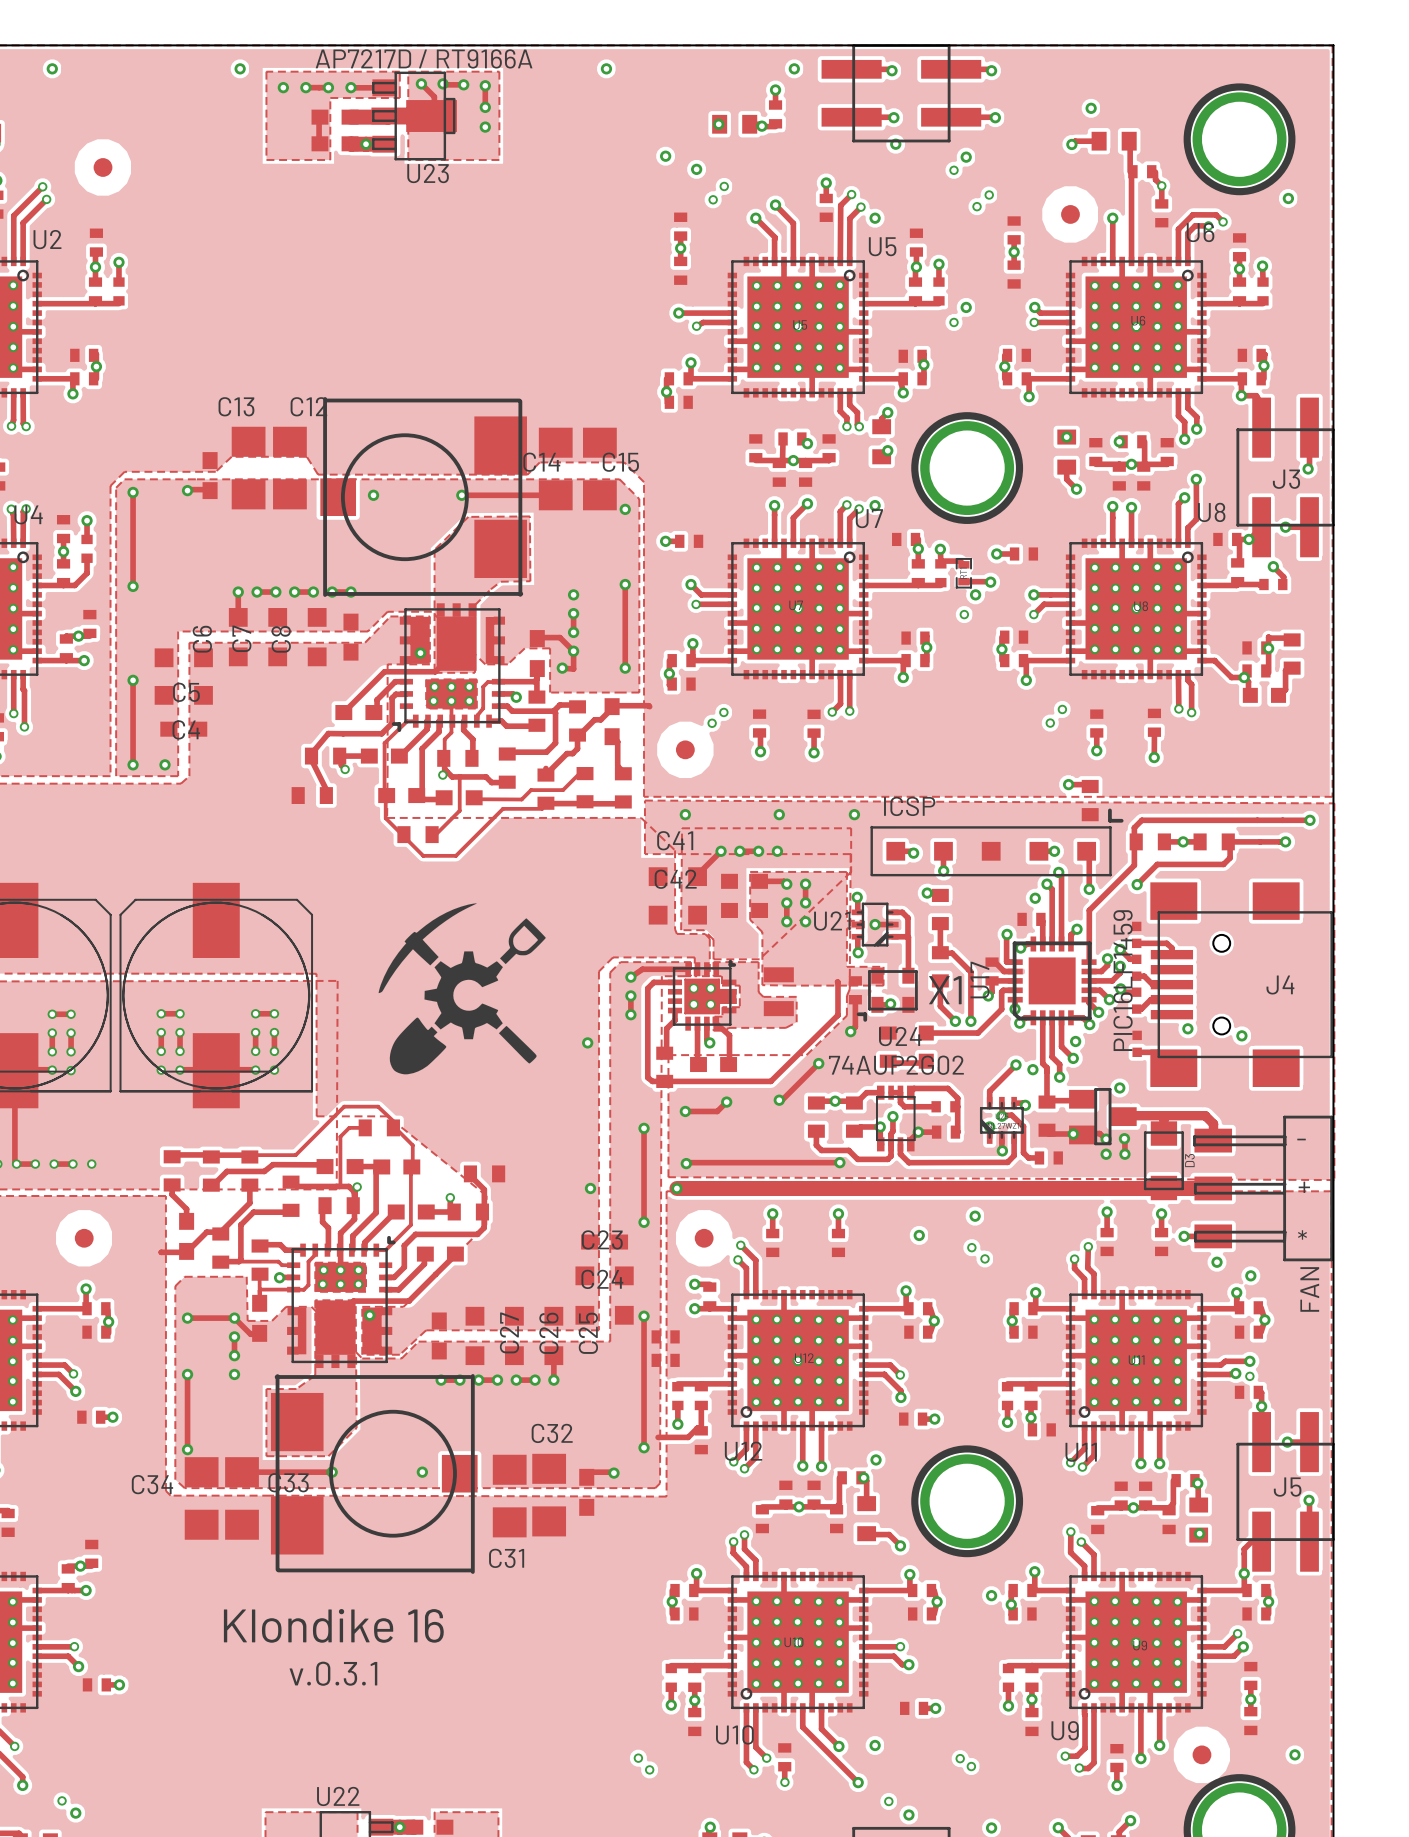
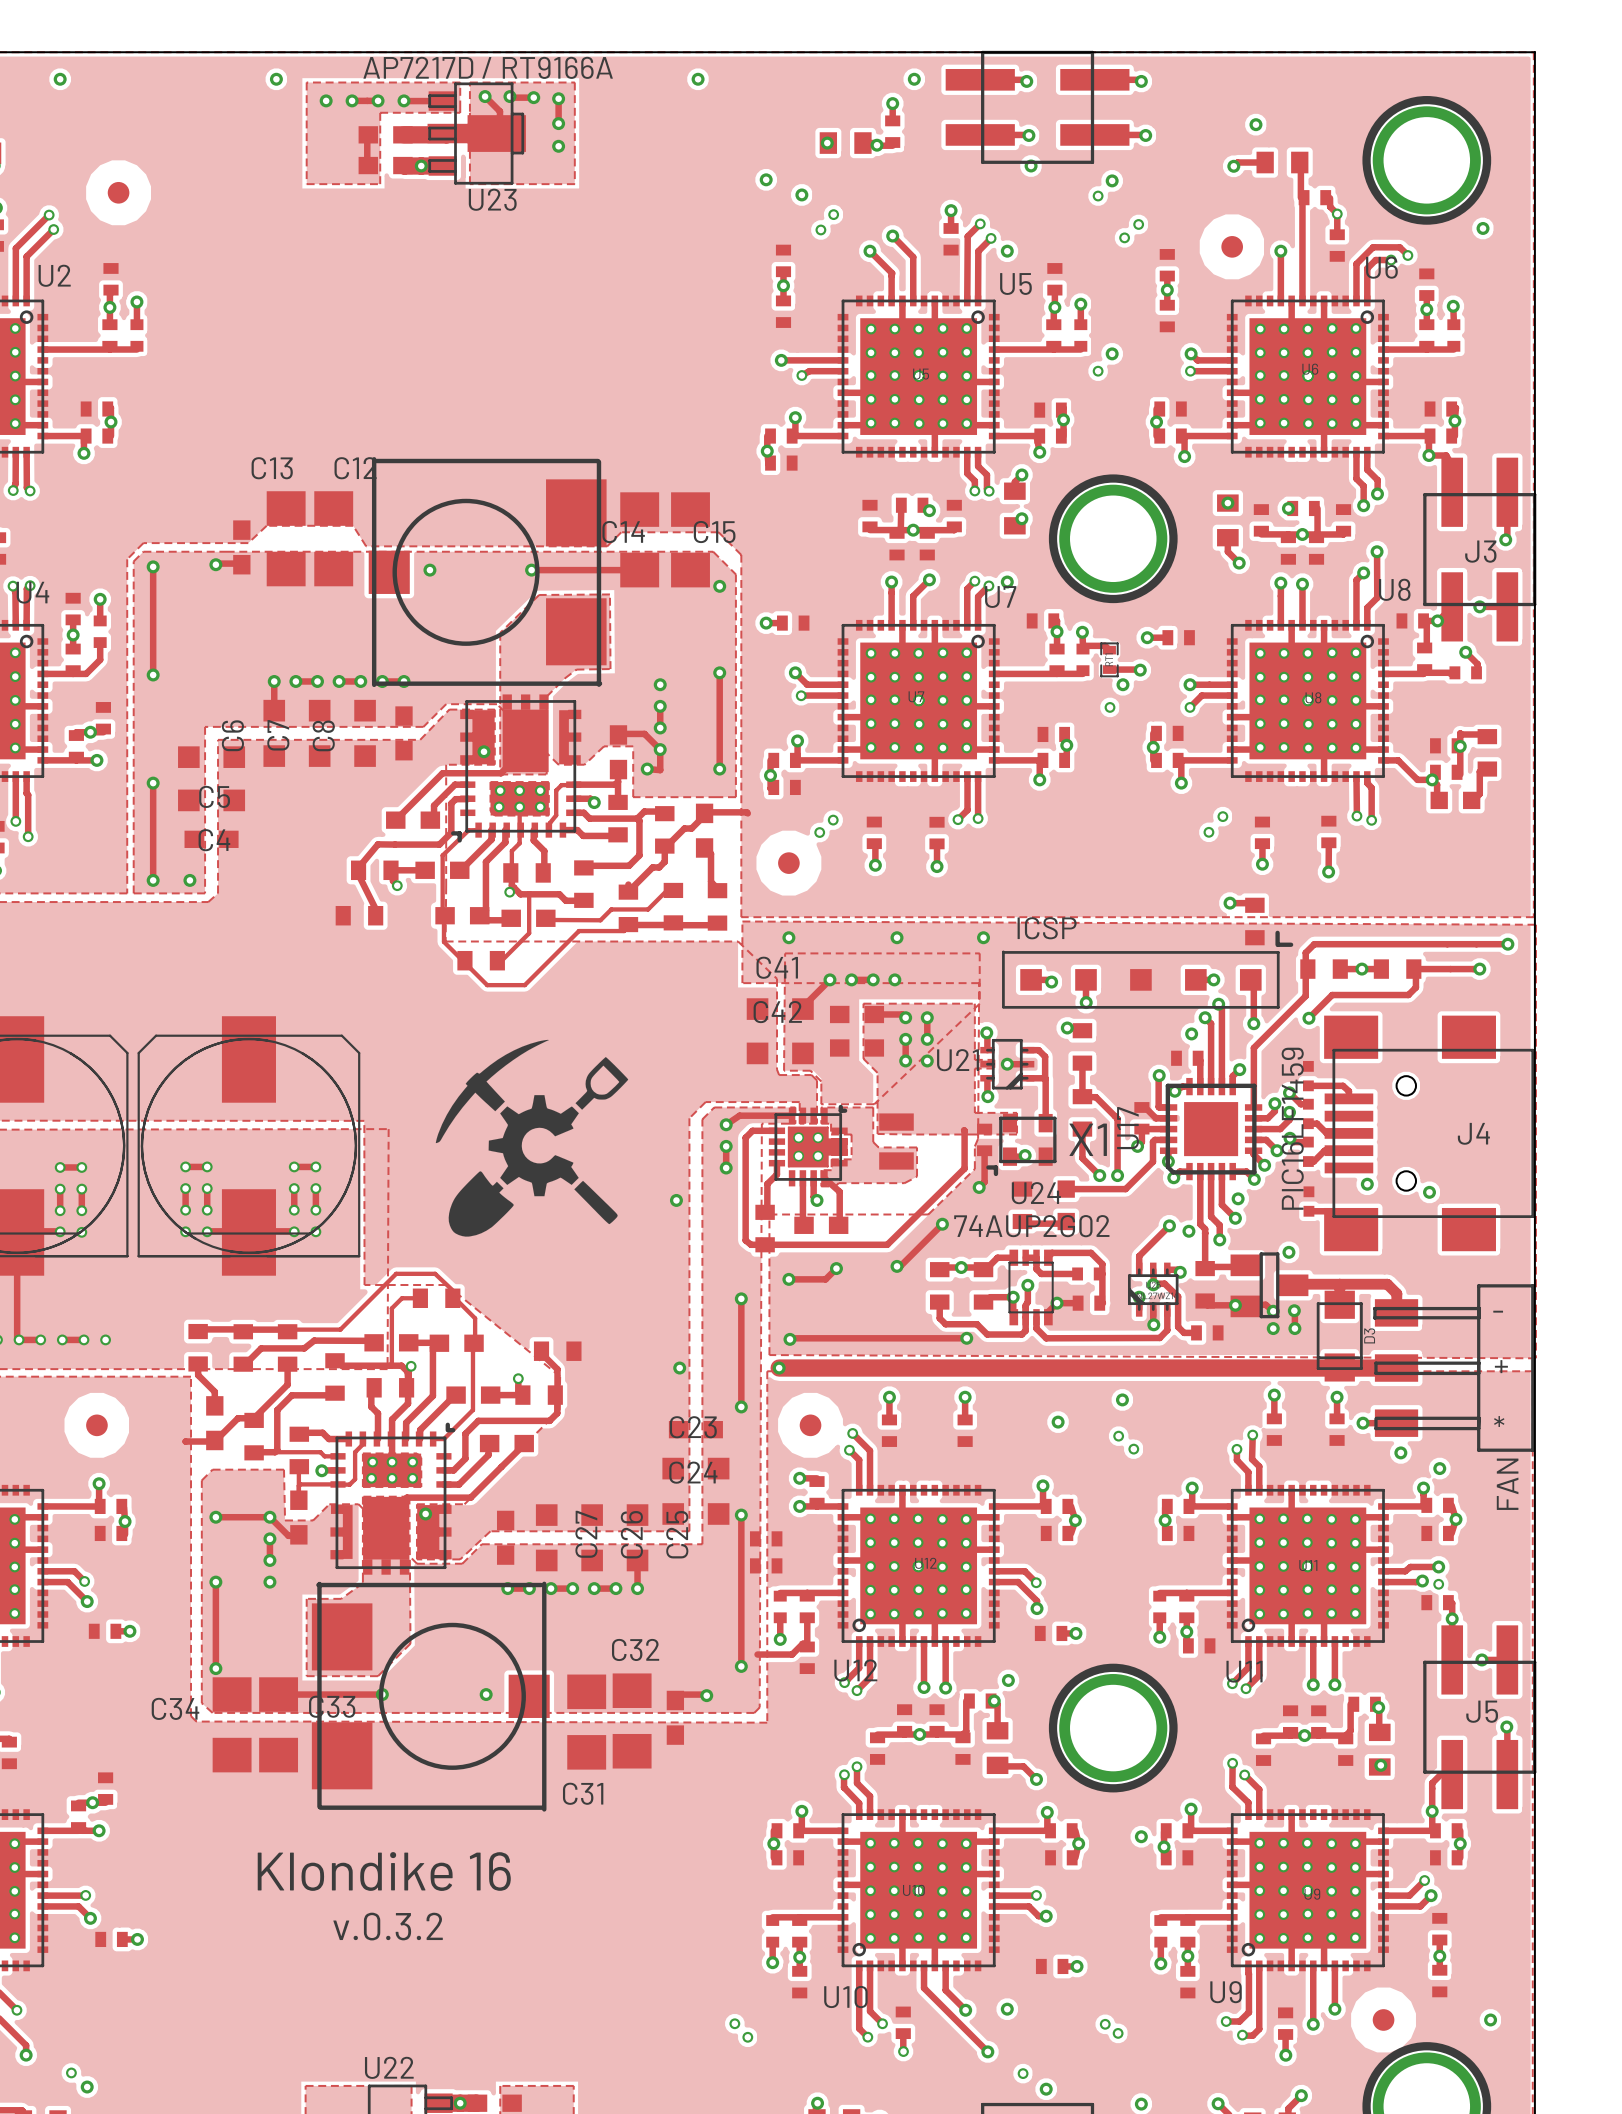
text: v.0.3.1 (333, 1673) -> v.0.3.2 (388, 1926)

